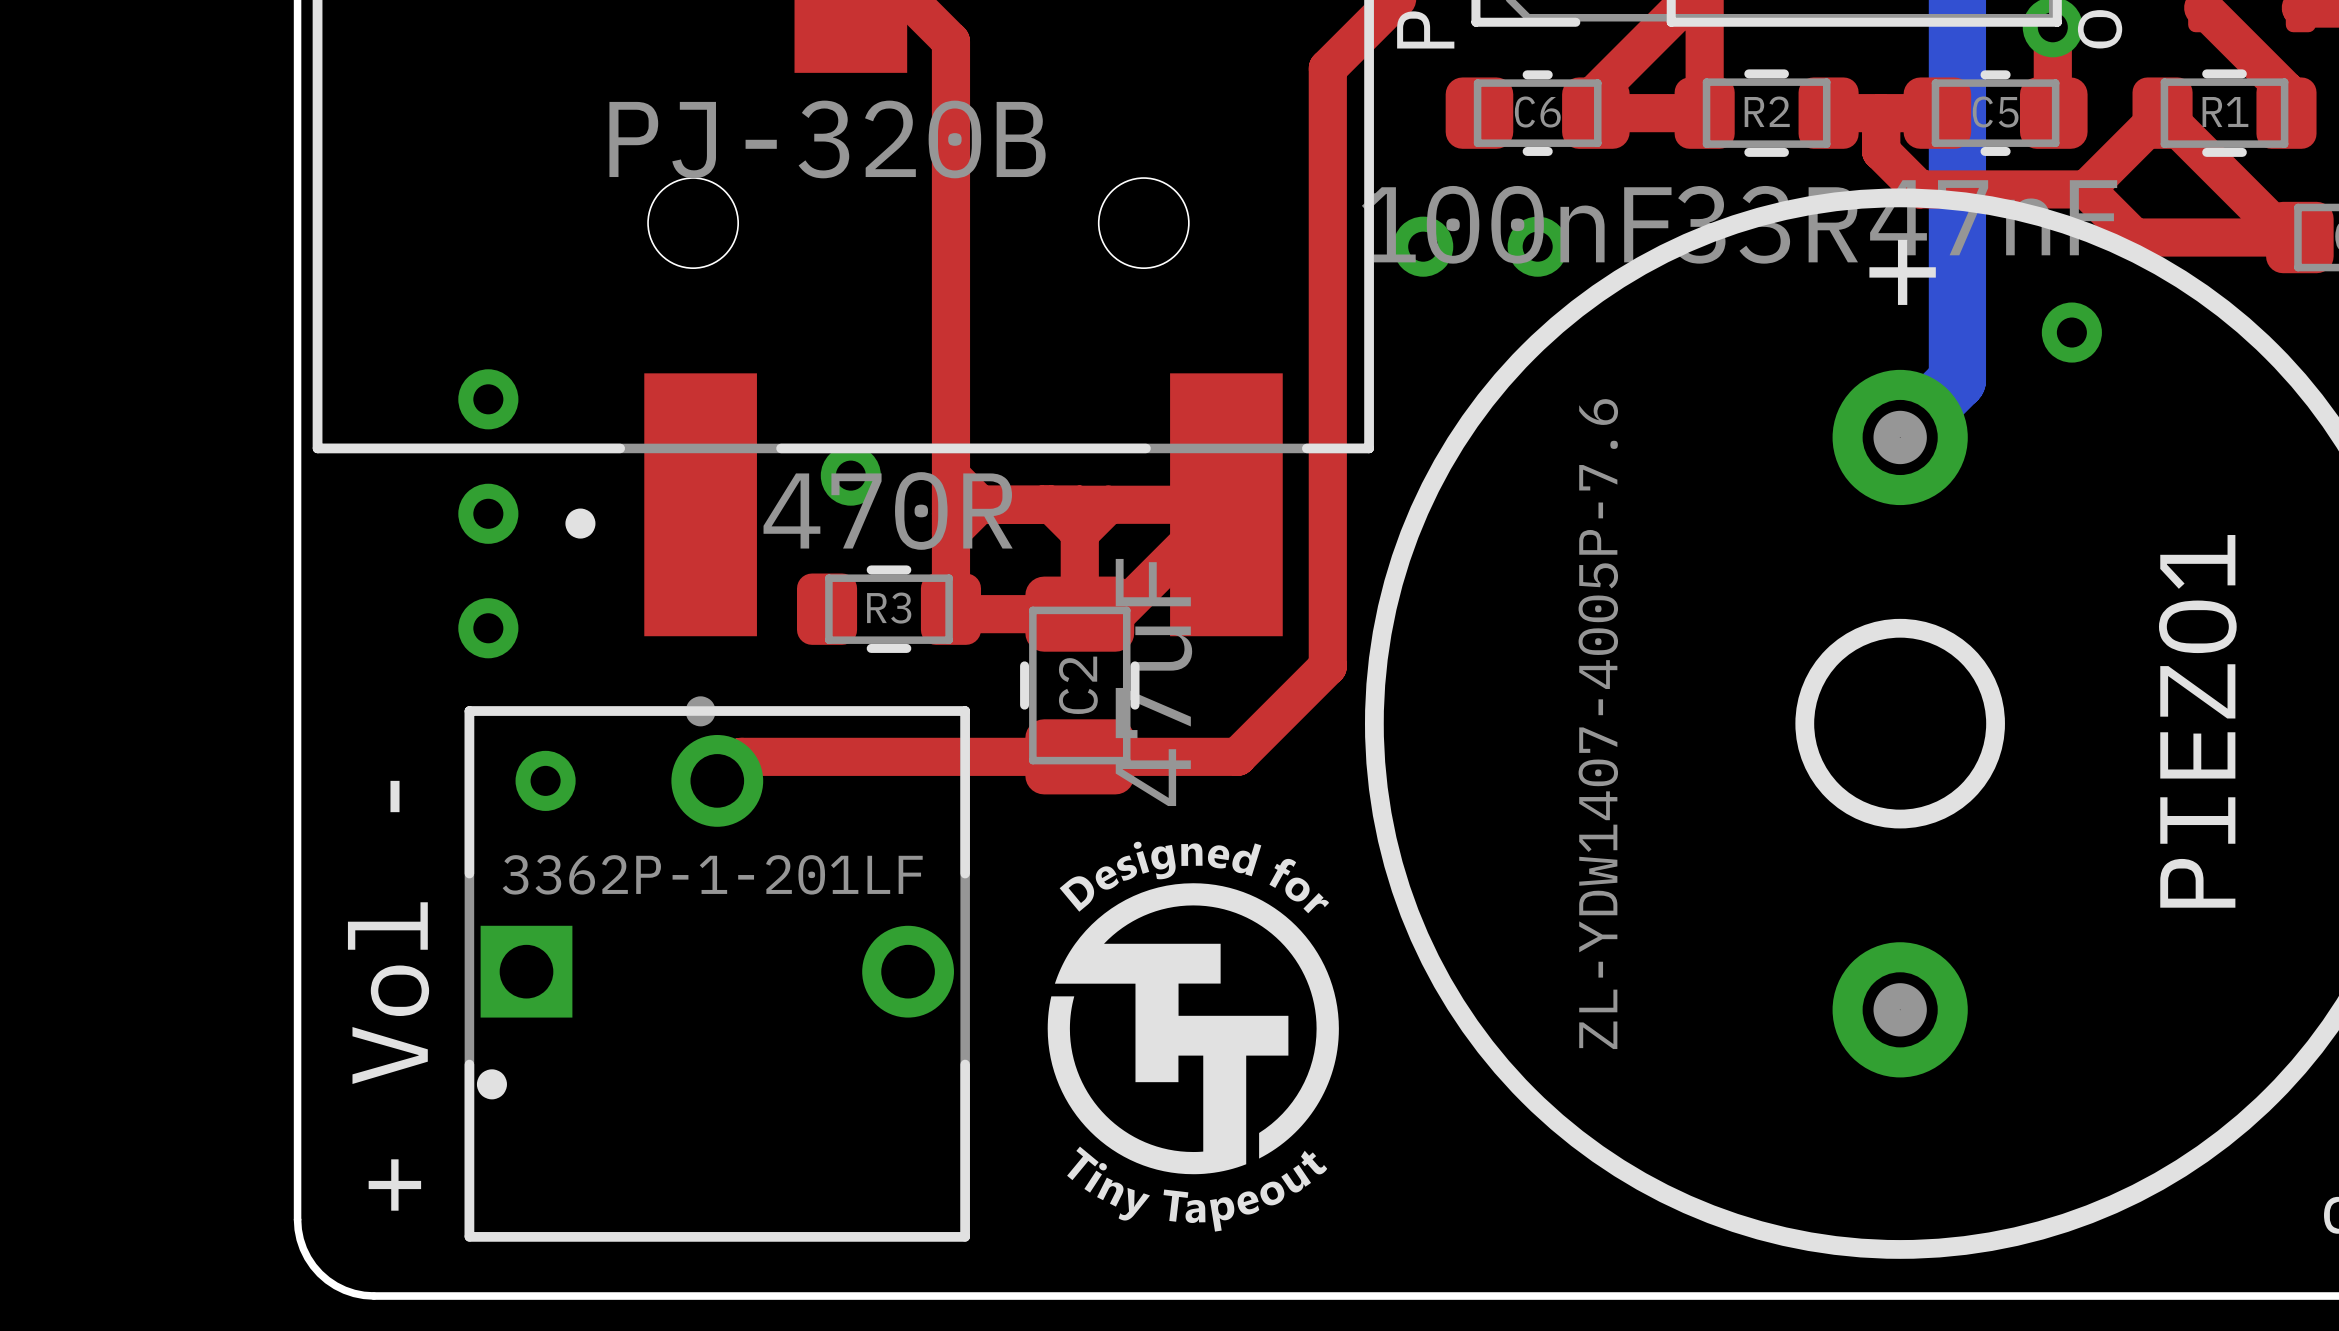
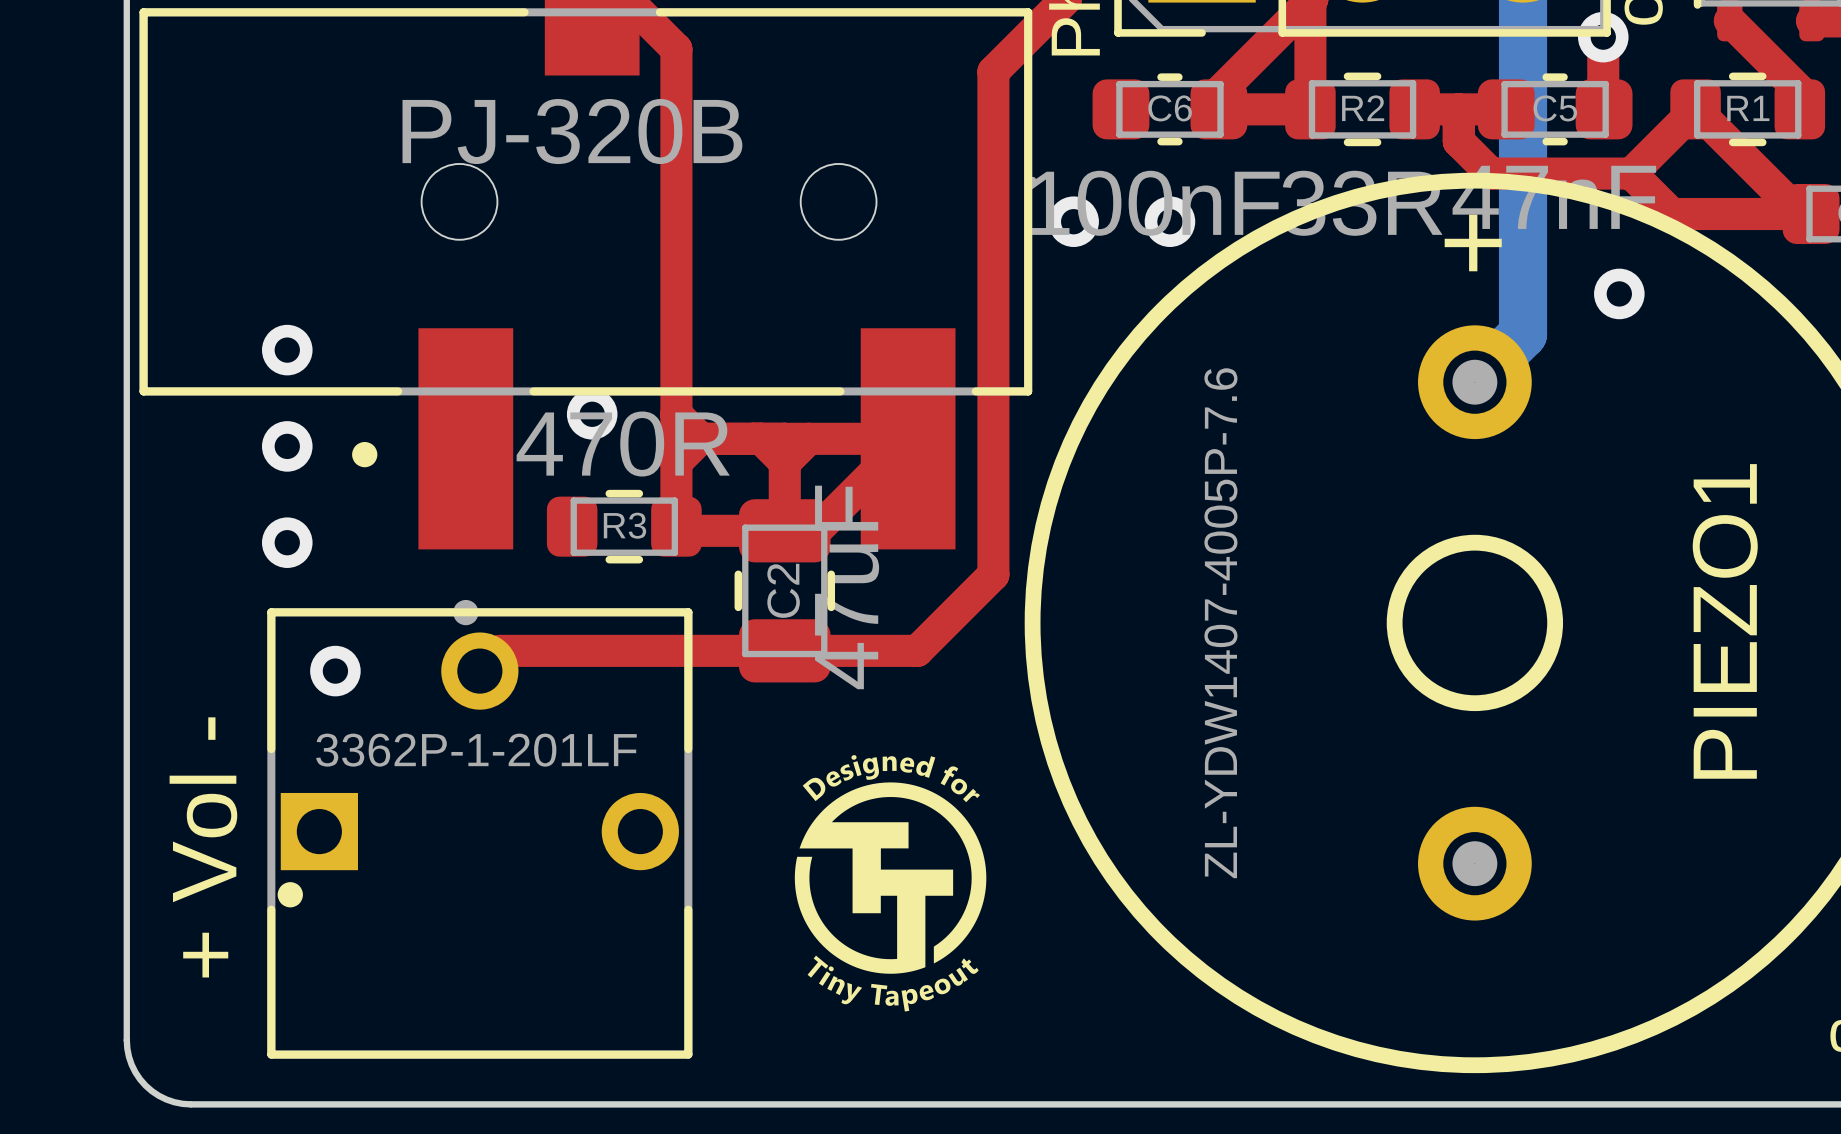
part footprint: [464, 706, 970, 1242] -> [267, 608, 693, 1059]
drawing: [1059, 843, 1330, 914] -> none
drawing position: (1137, 845) -> (853, 757)
drawing shape: [1285, 877, 1310, 902] -> [940, 766, 959, 786]
drawing: none -> [802, 756, 980, 803]
drawing shape: [1047, 883, 1339, 1175] -> [794, 782, 987, 974]
drawing: none -> [807, 955, 979, 1012]
drawing: [1067, 1146, 1328, 1232] -> none
drawing position: (1103, 1166) -> (831, 968)

